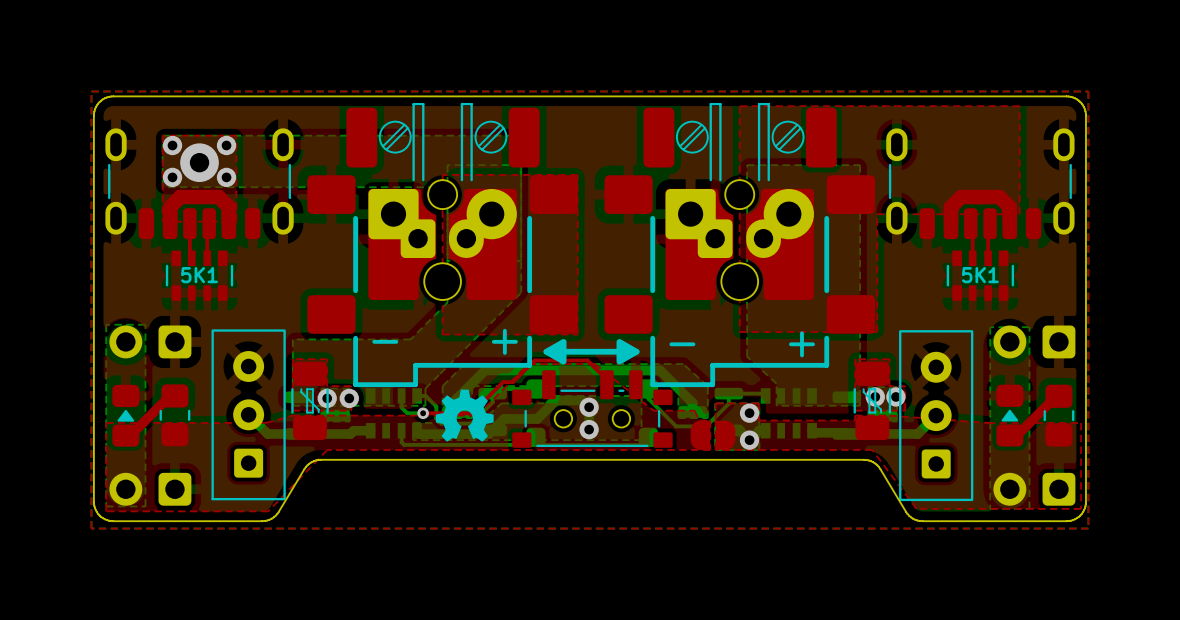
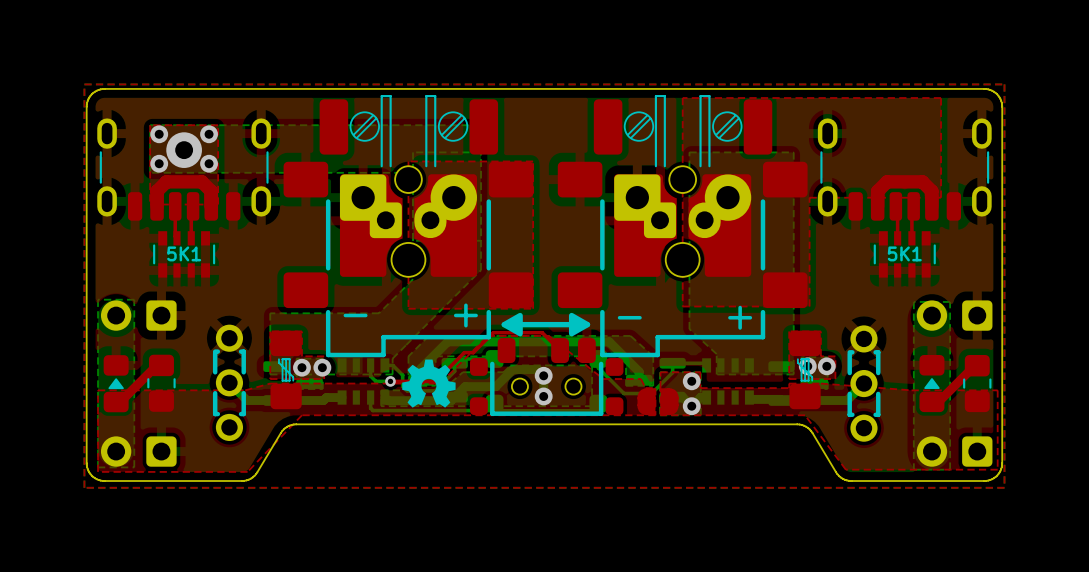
part footprint: [211, 329, 286, 501] -> [212, 324, 246, 442]
part footprint: [899, 330, 974, 502] -> [847, 325, 881, 442]
part footprint: [291, 361, 329, 441] -> [270, 330, 302, 410]
part footprint: [853, 361, 892, 441] -> [789, 330, 821, 410]
part footprint: [512, 370, 673, 448] -> [469, 338, 624, 416]

